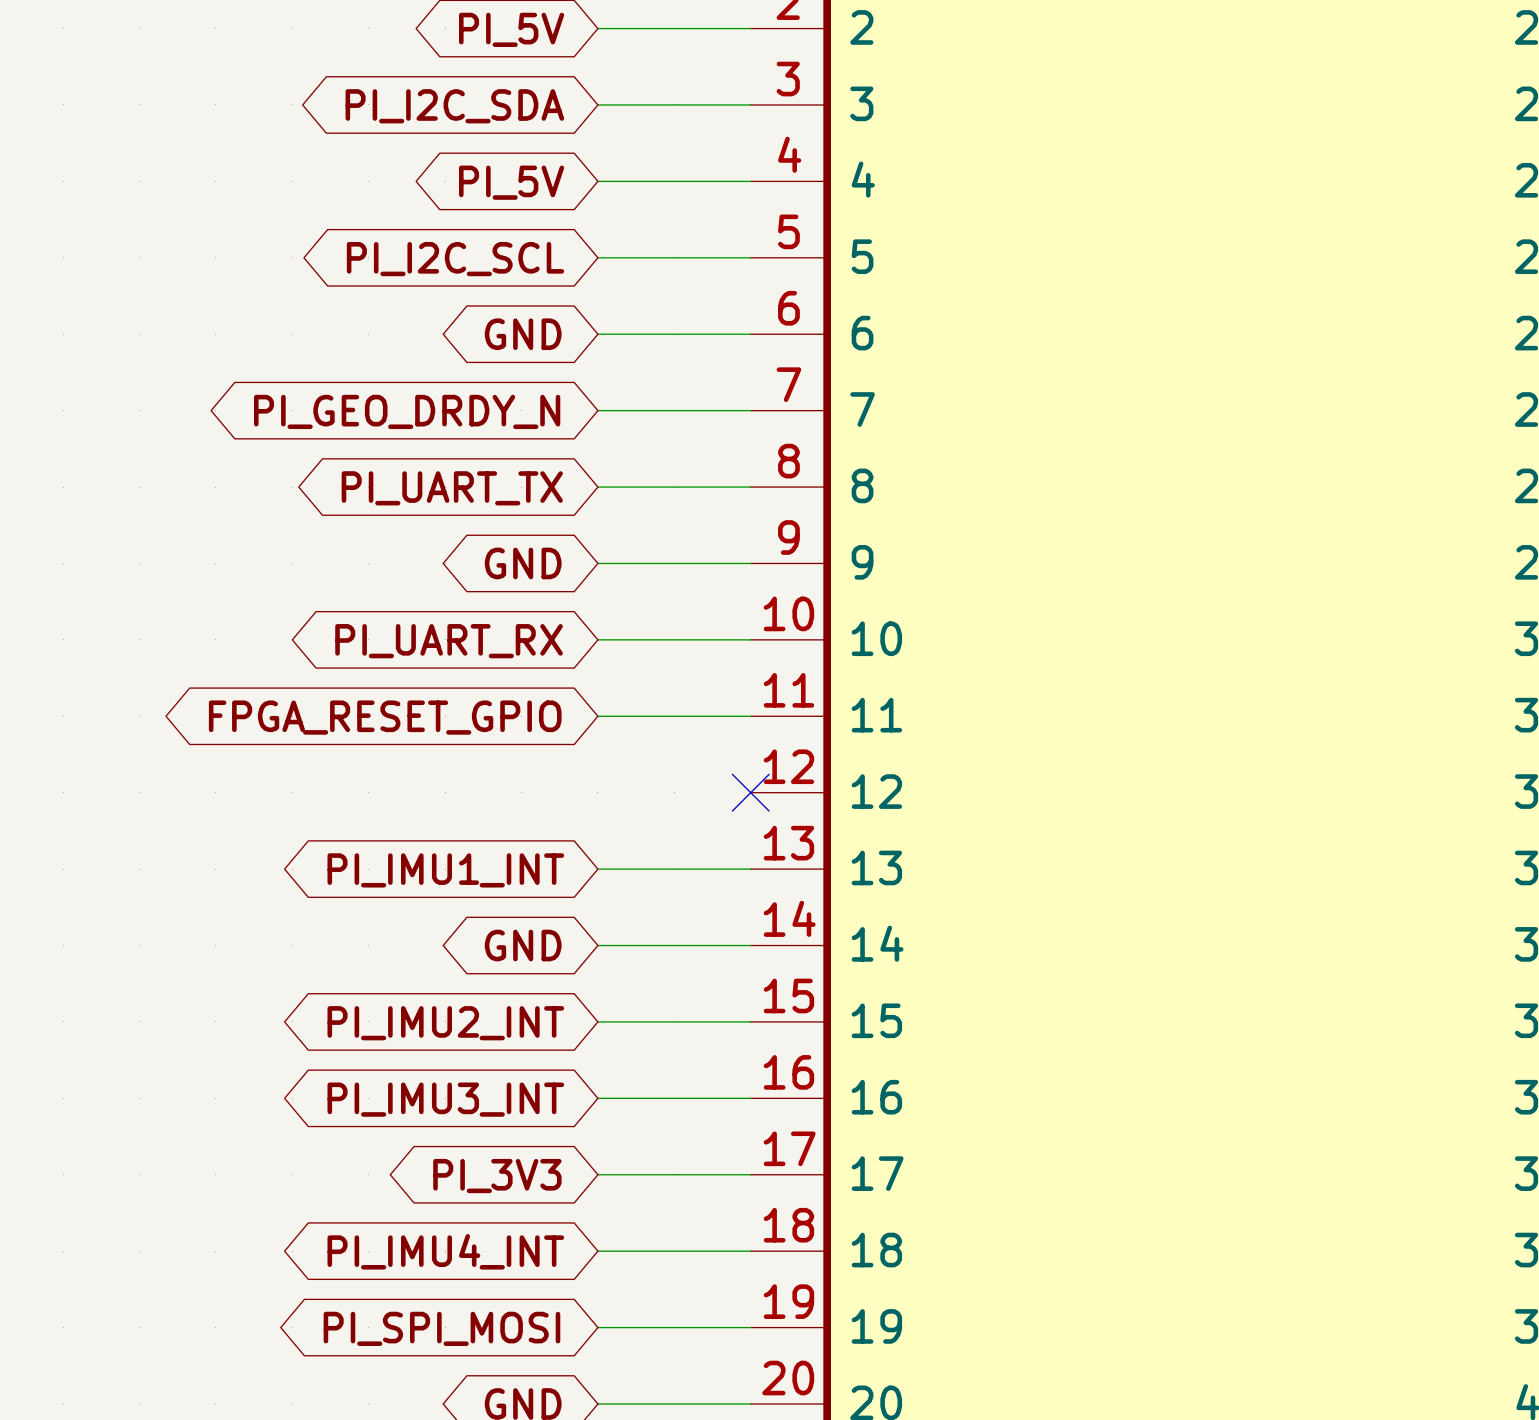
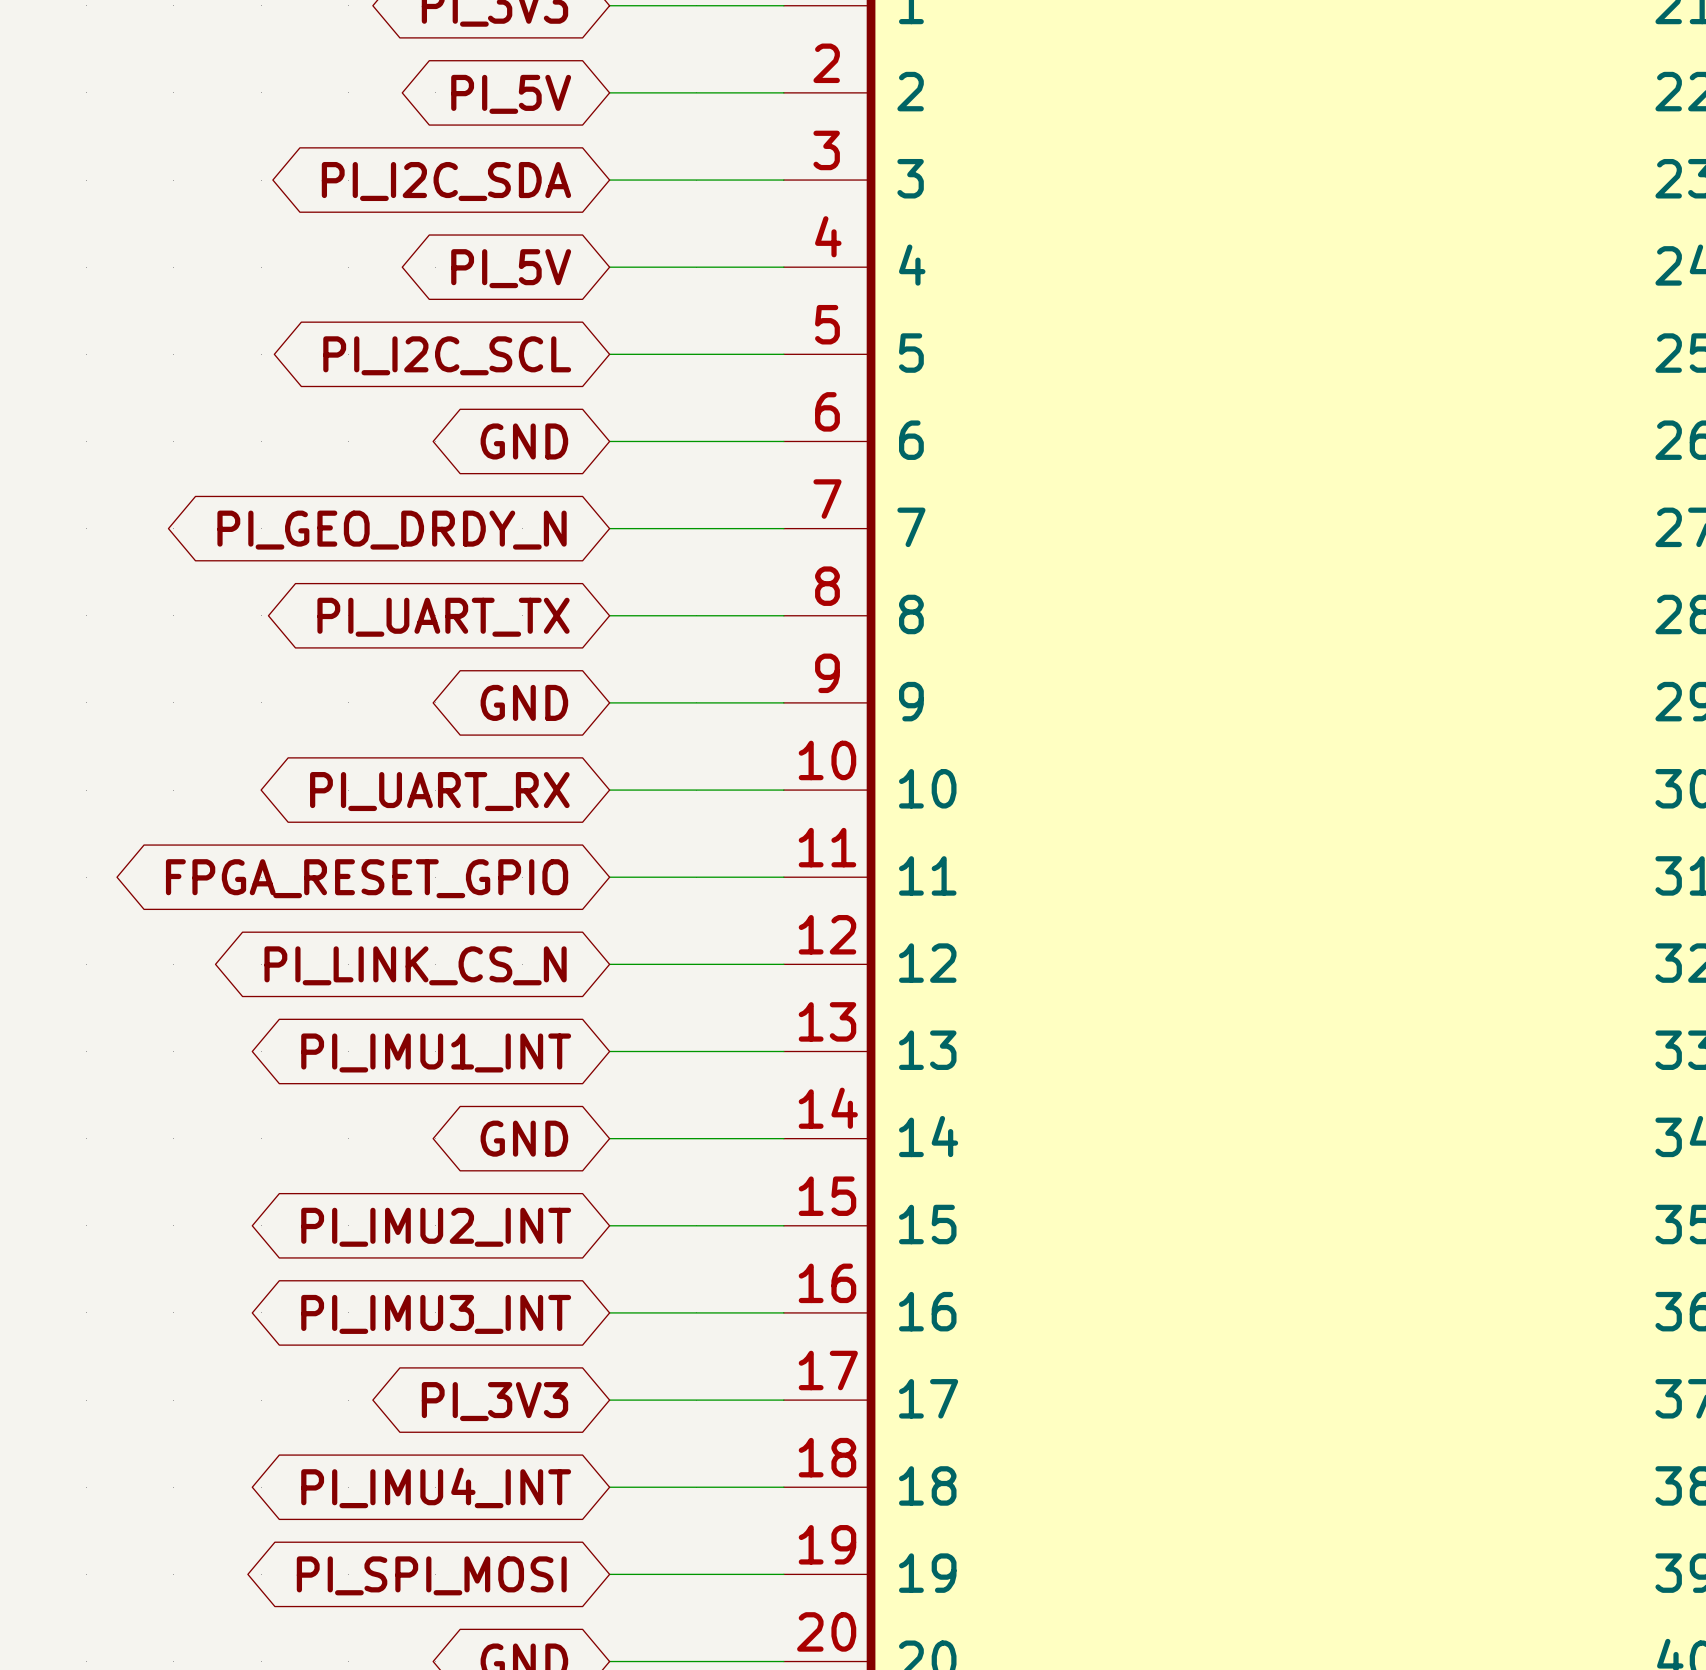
wire: none -> (609, 964) (783, 964)
no-connect mark: (750, 792) -> none
global label: none -> PI_LINK_CS_N (415, 965)

